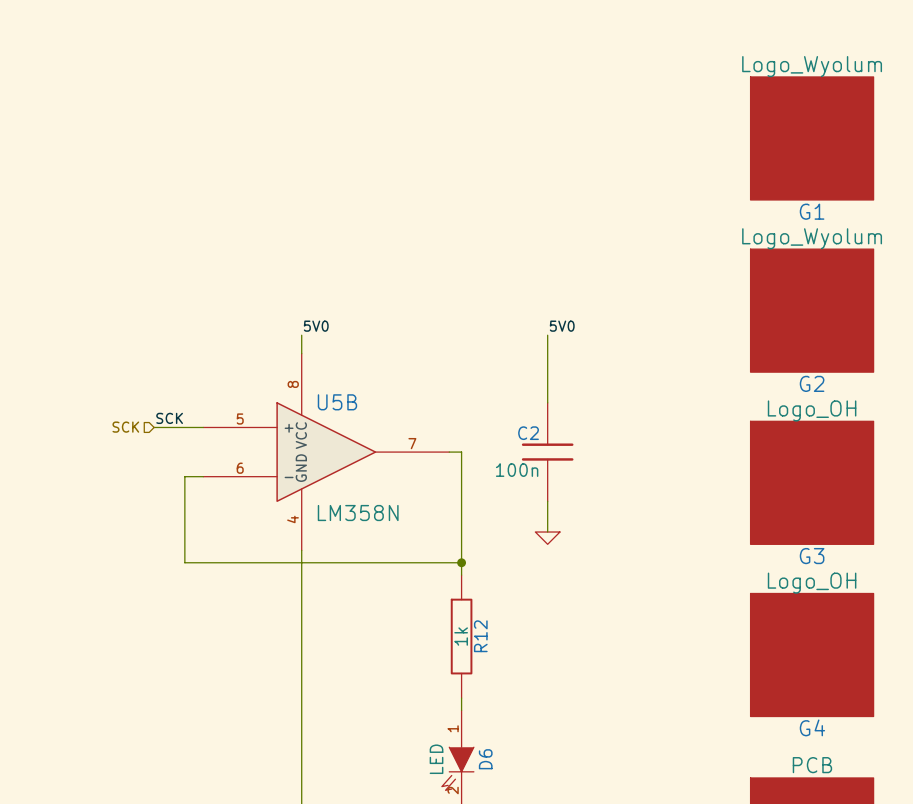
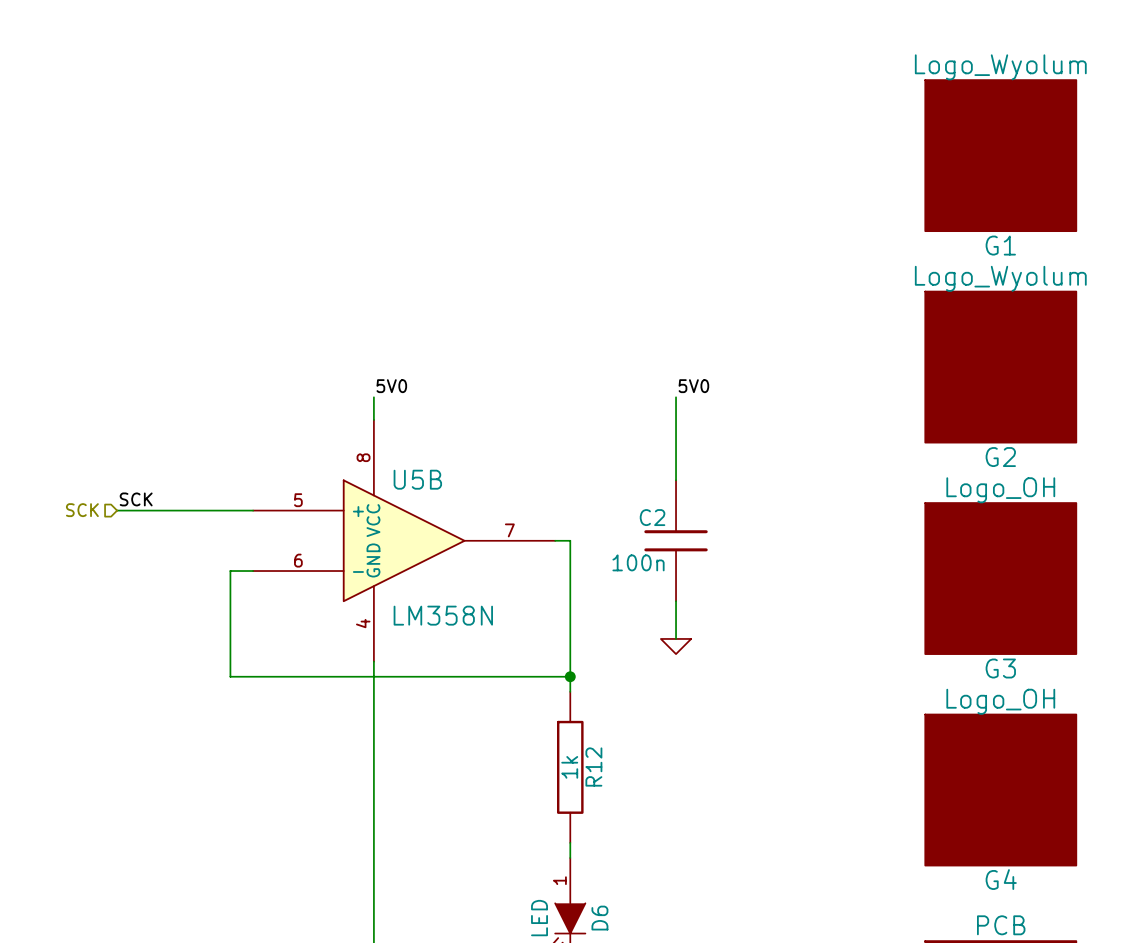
label position: SCK (169, 418) -> SCK (136, 499)
wire: none -> (117, 510) (192, 510)
hierarchical label position: SCK (125, 427) -> SCK (82, 510)

